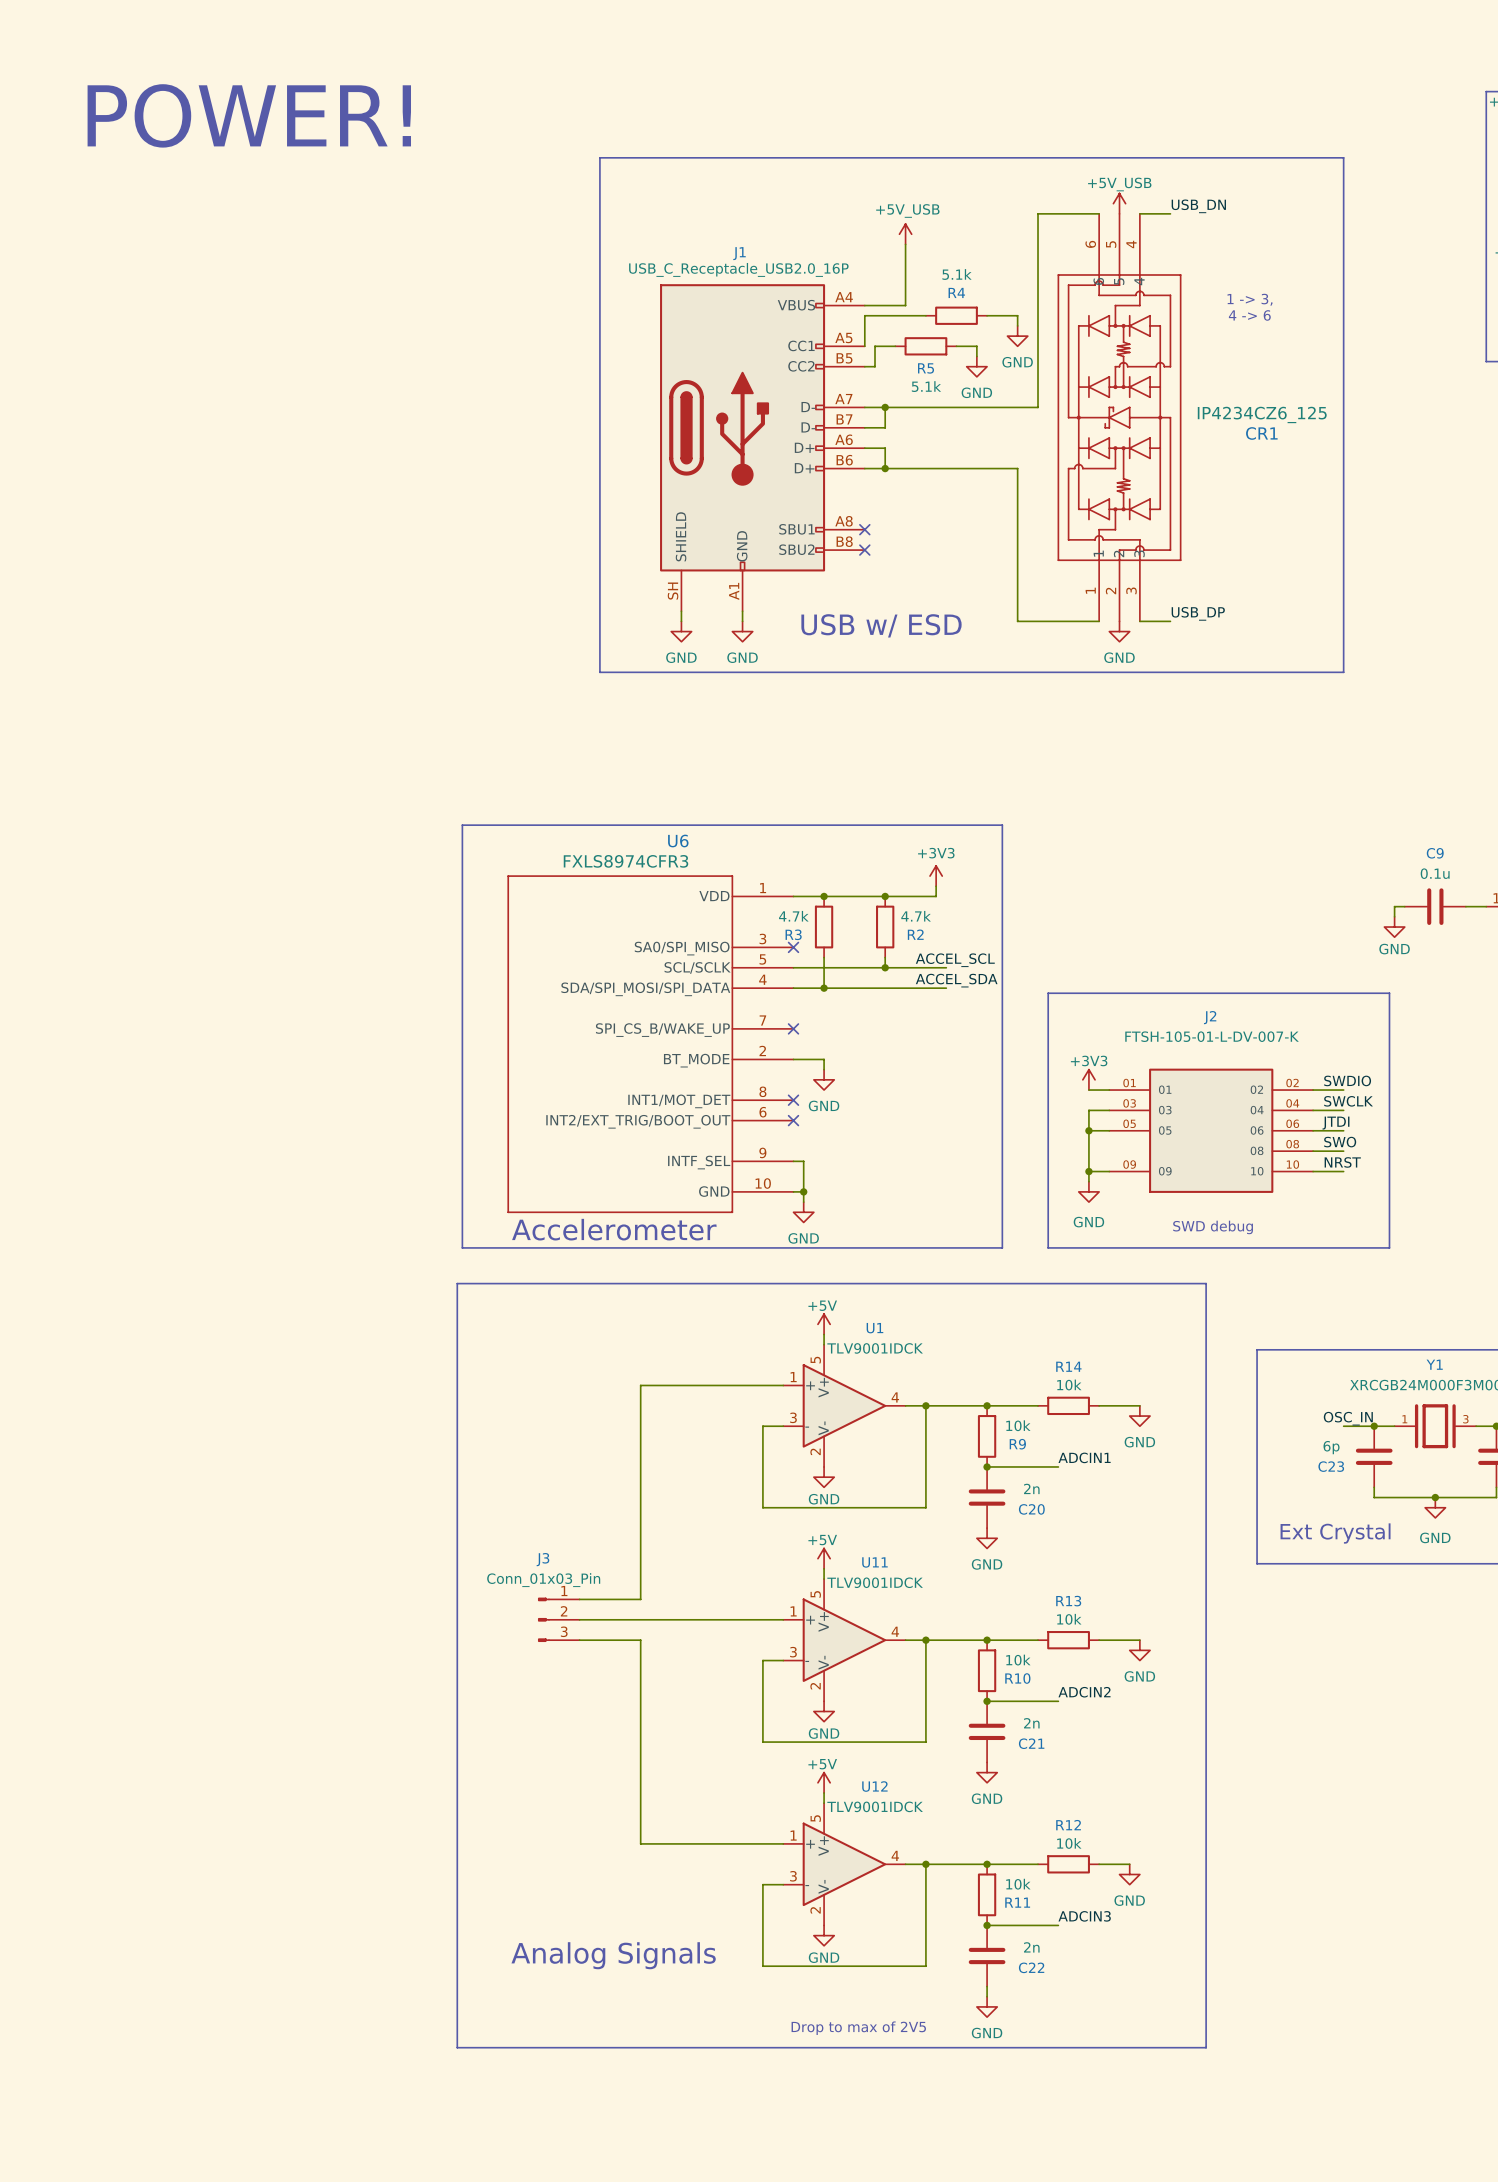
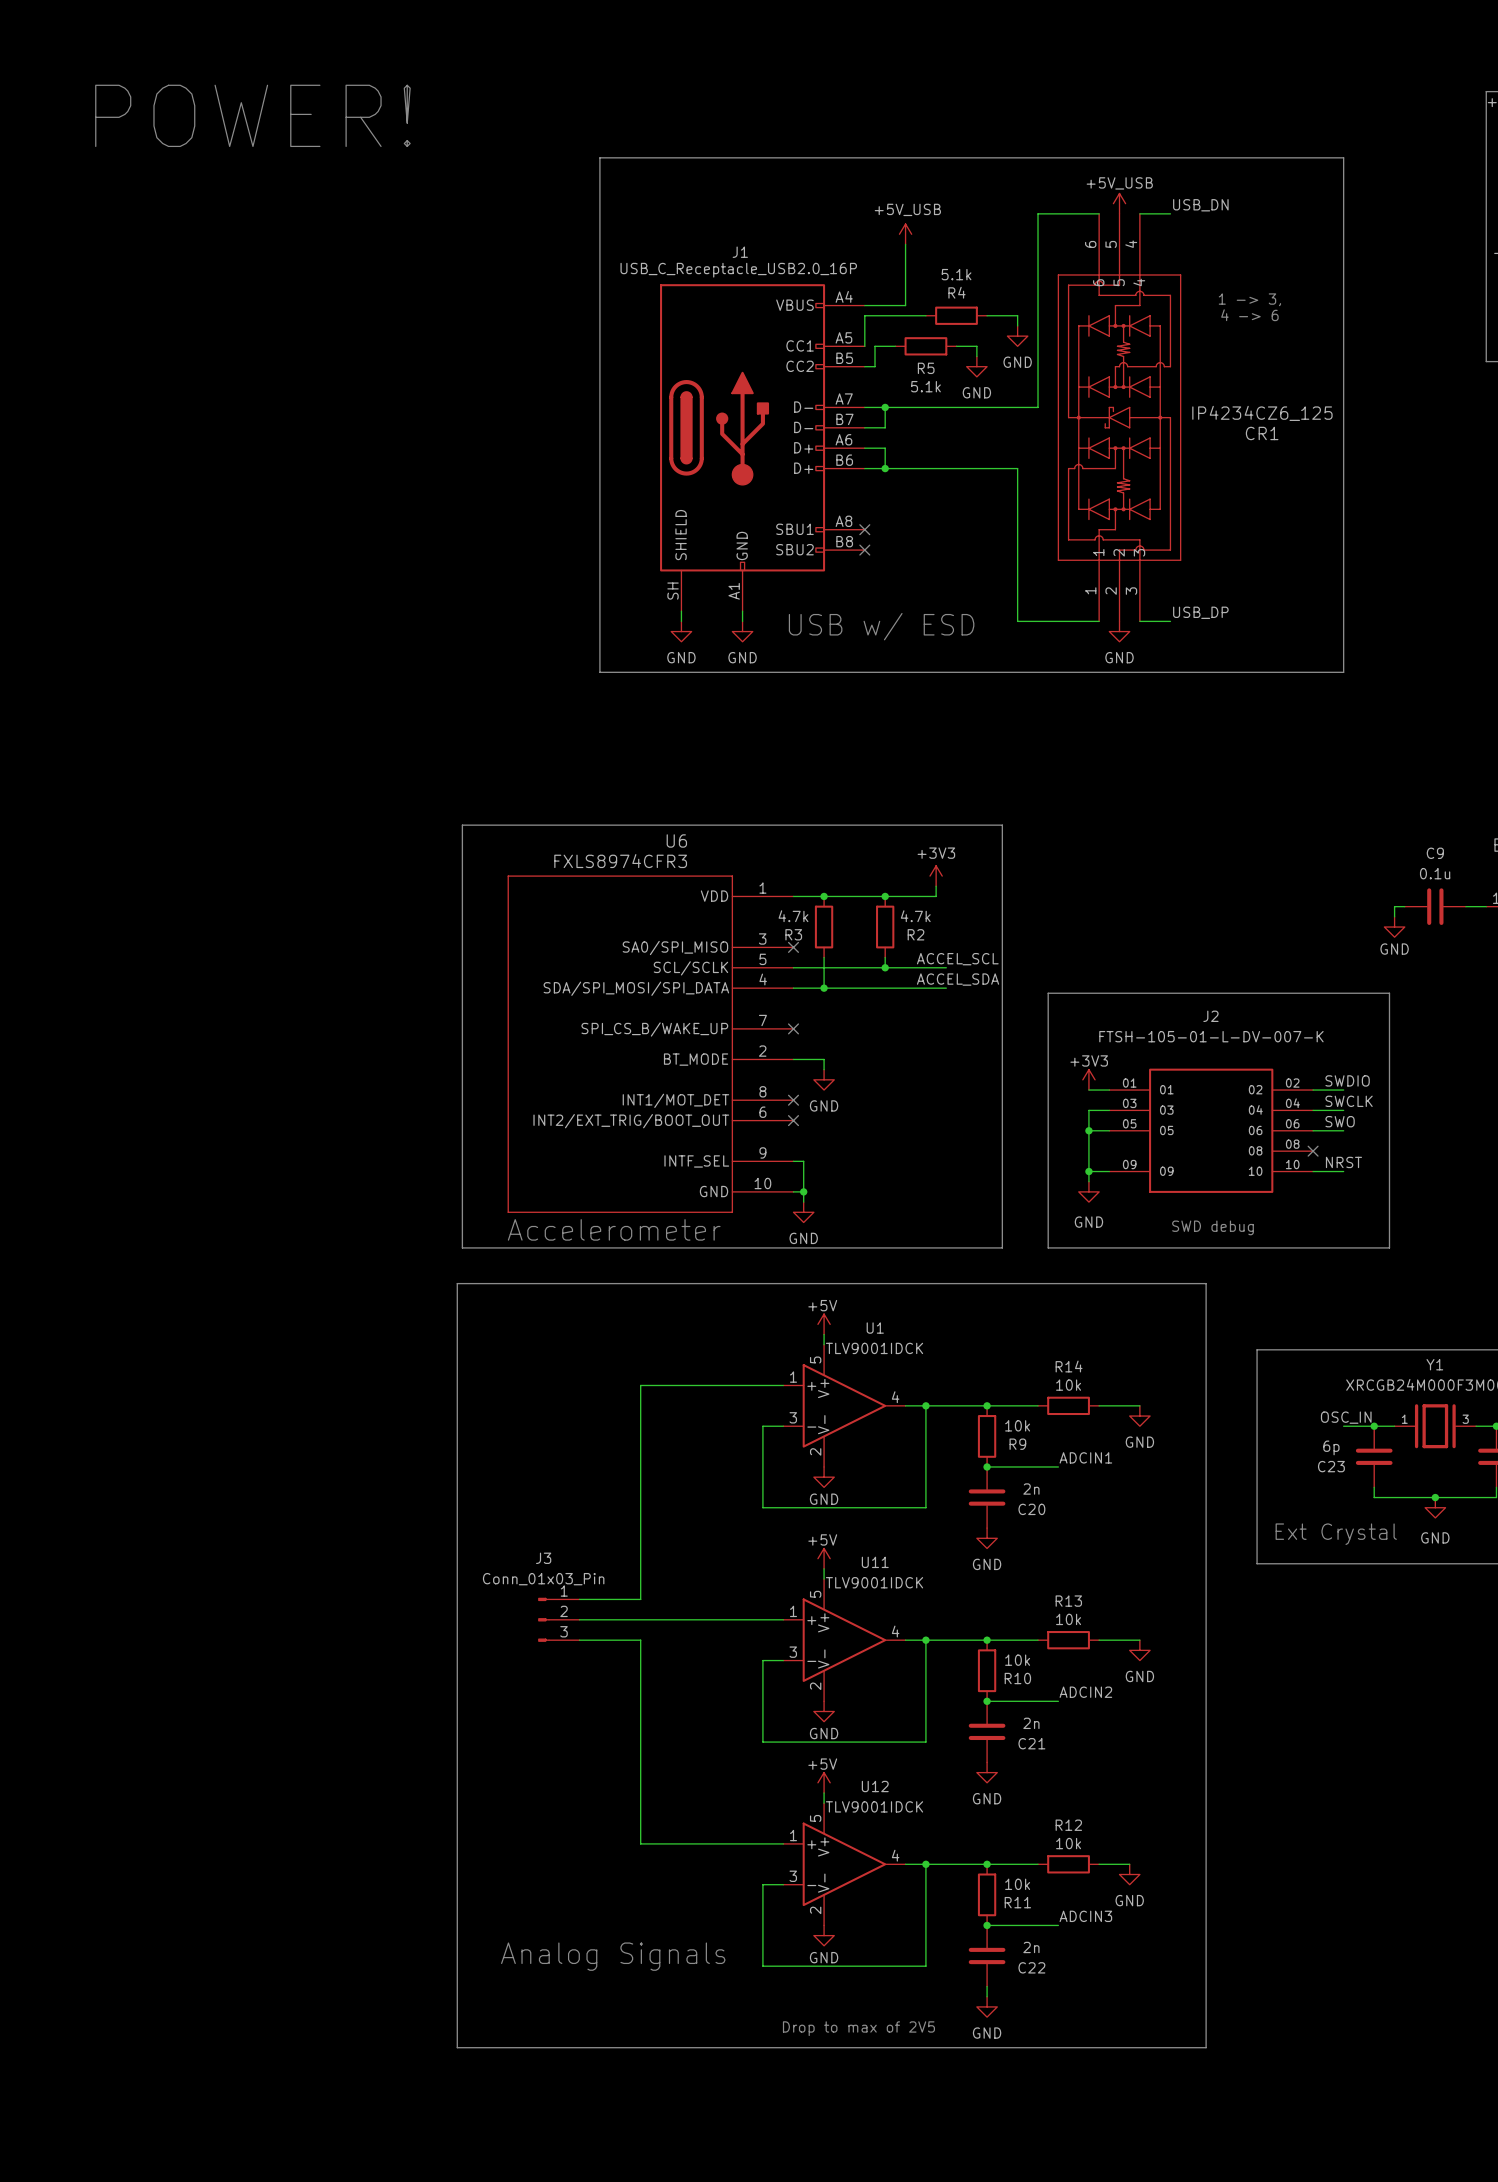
label: JTDI (1335, 1123) -> SWO (1340, 1121)
label: SWO (1340, 1142) -> none
wire: (1313, 1151) (1343, 1151) -> none
no-connect mark: none -> (1313, 1151)

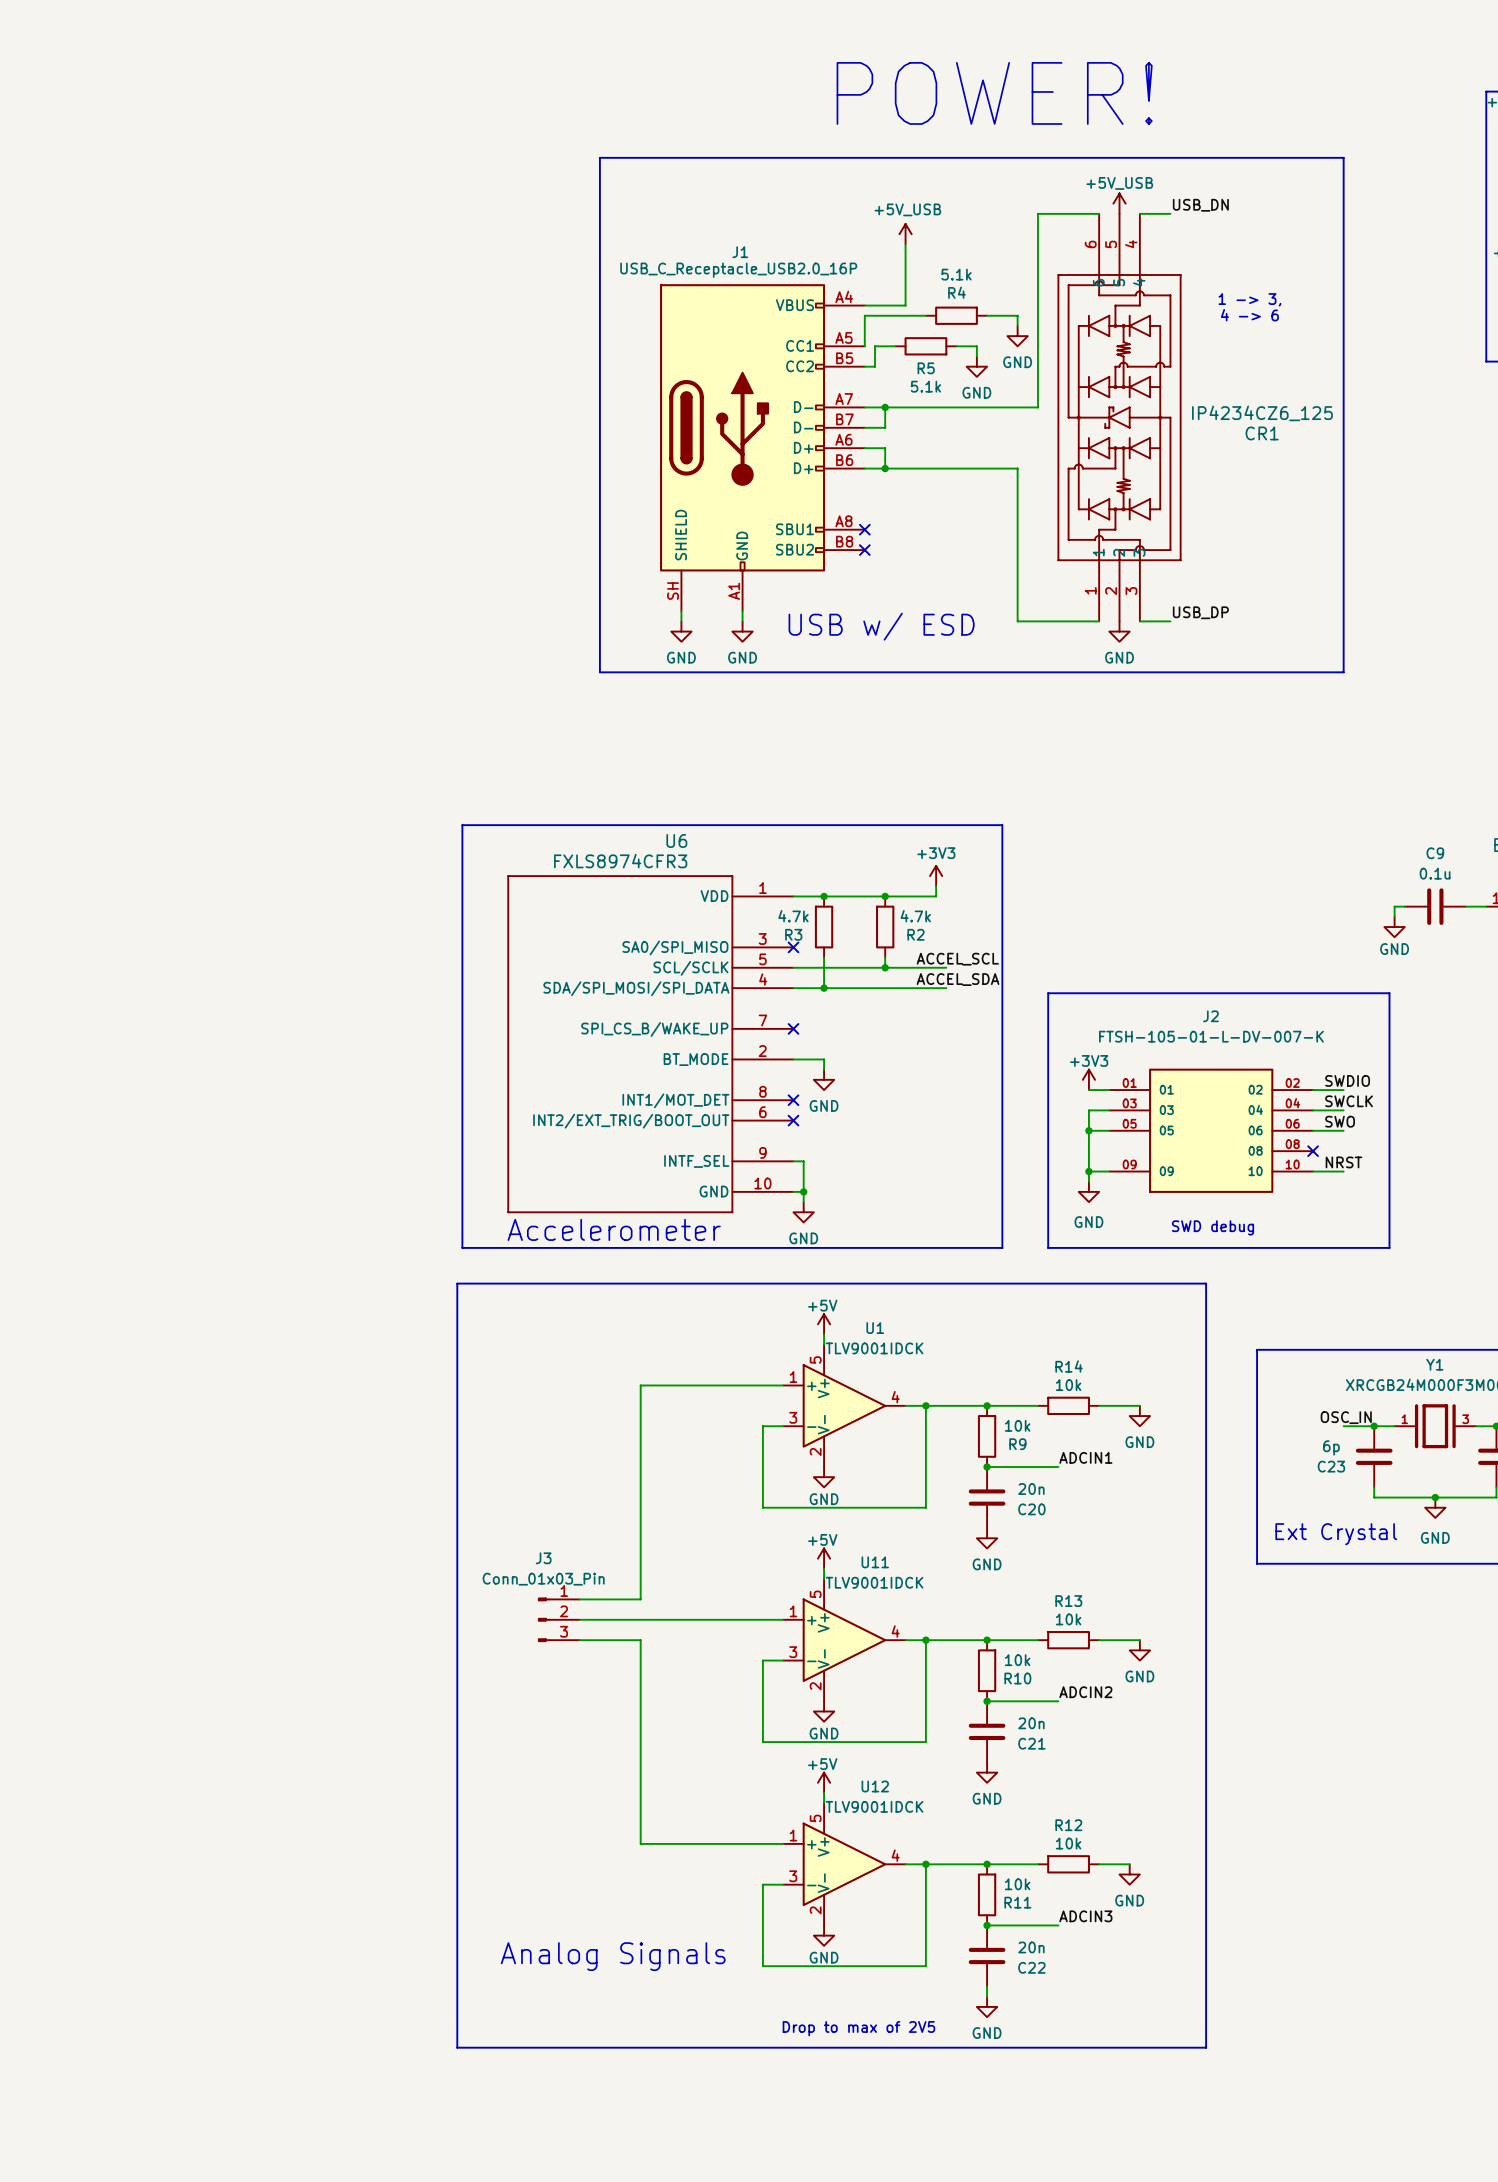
text: none -> POWER! (994, 93)
text: POWER! (252, 115) -> none
C20 value: 2n (1031, 1489) -> 20n (1031, 1489)
C21 value: 2n (1031, 1723) -> 20n (1031, 1723)
C22 value: 2n (1031, 1947) -> 20n (1031, 1947)

